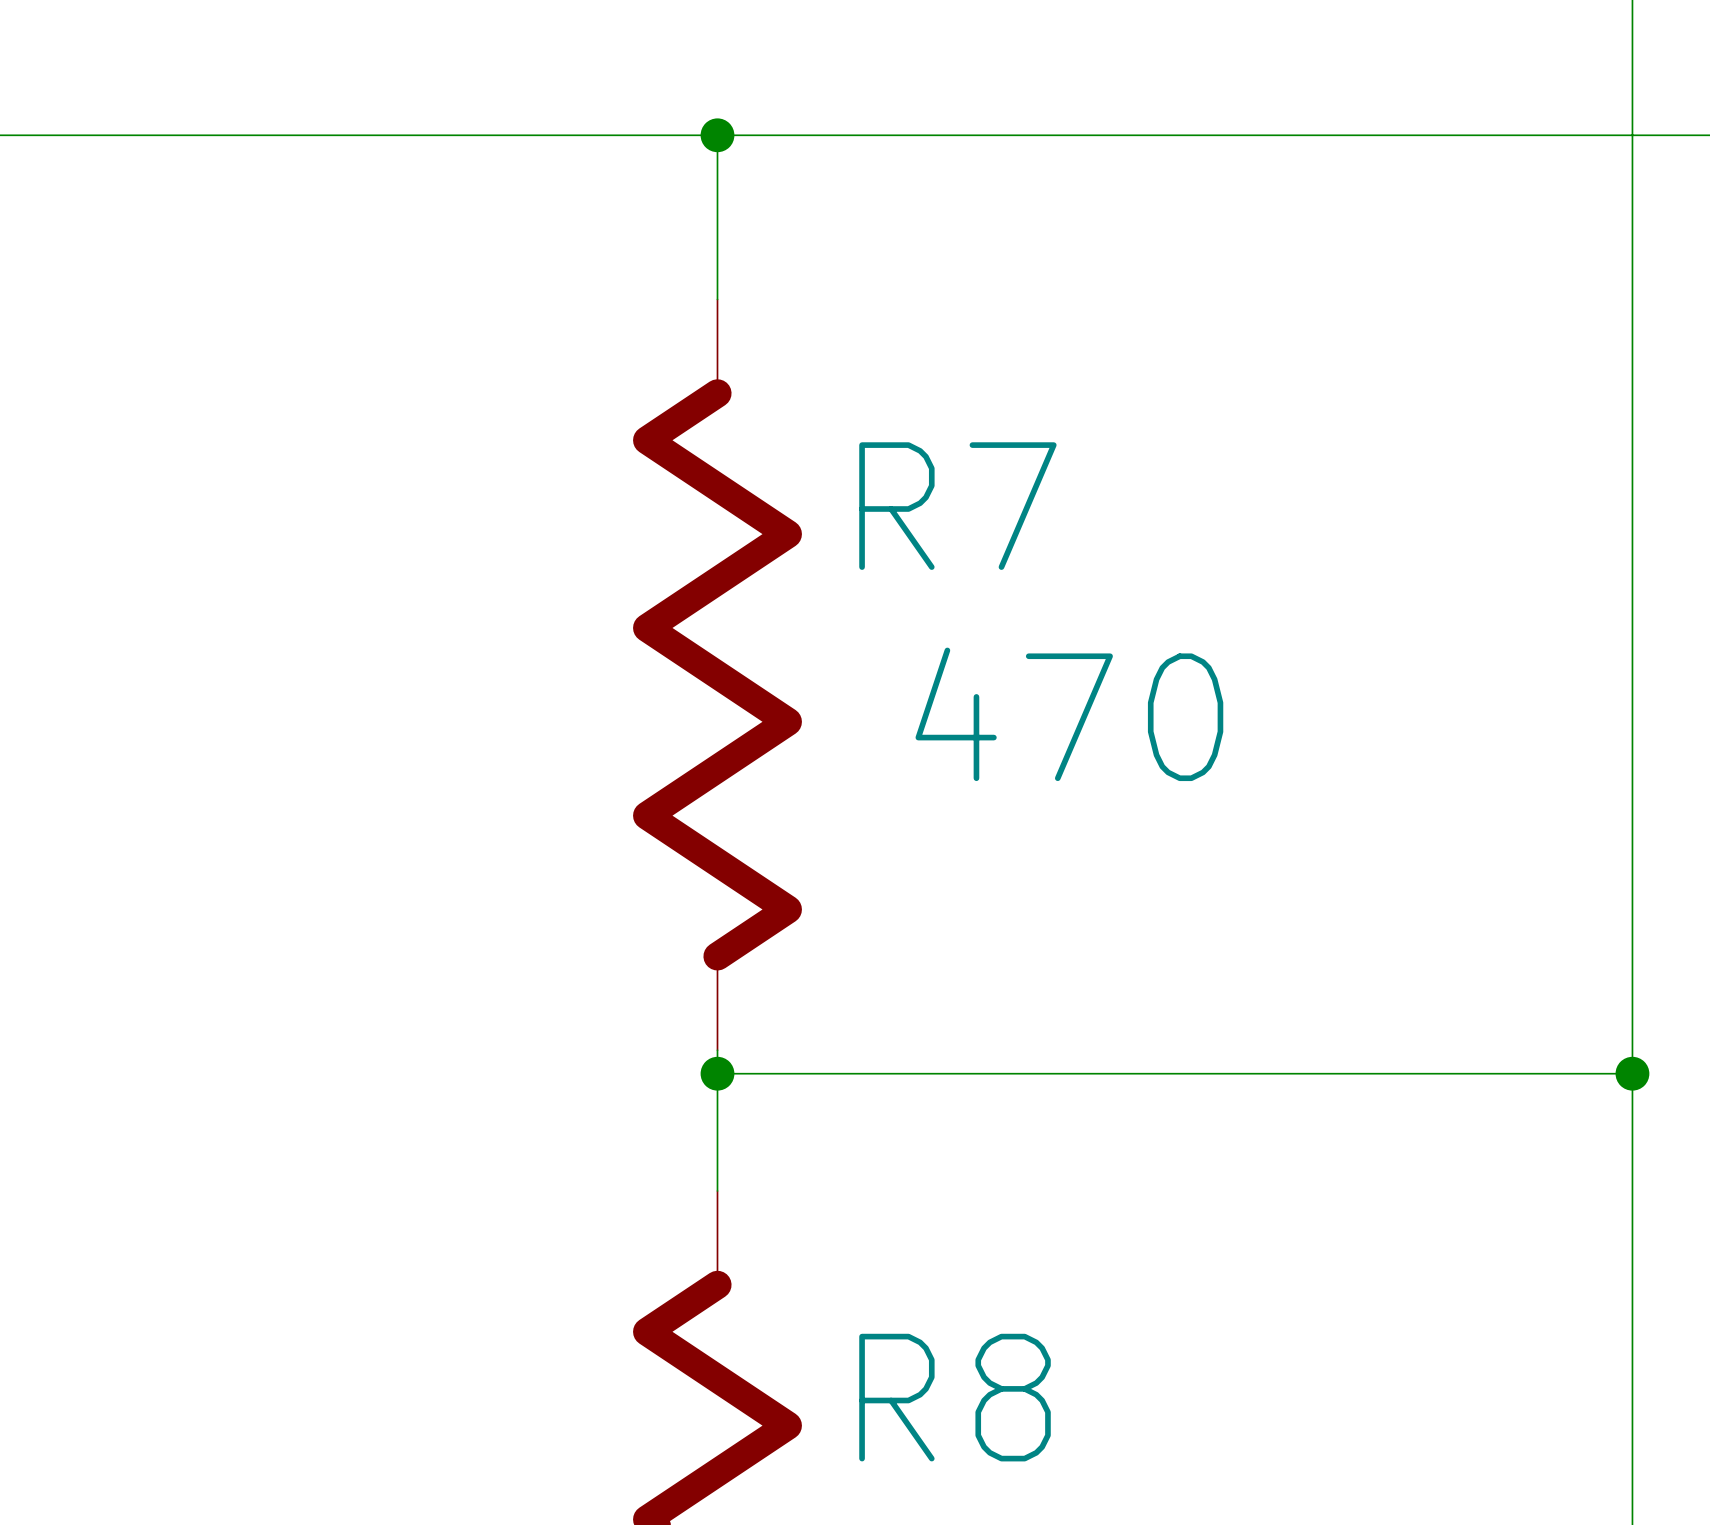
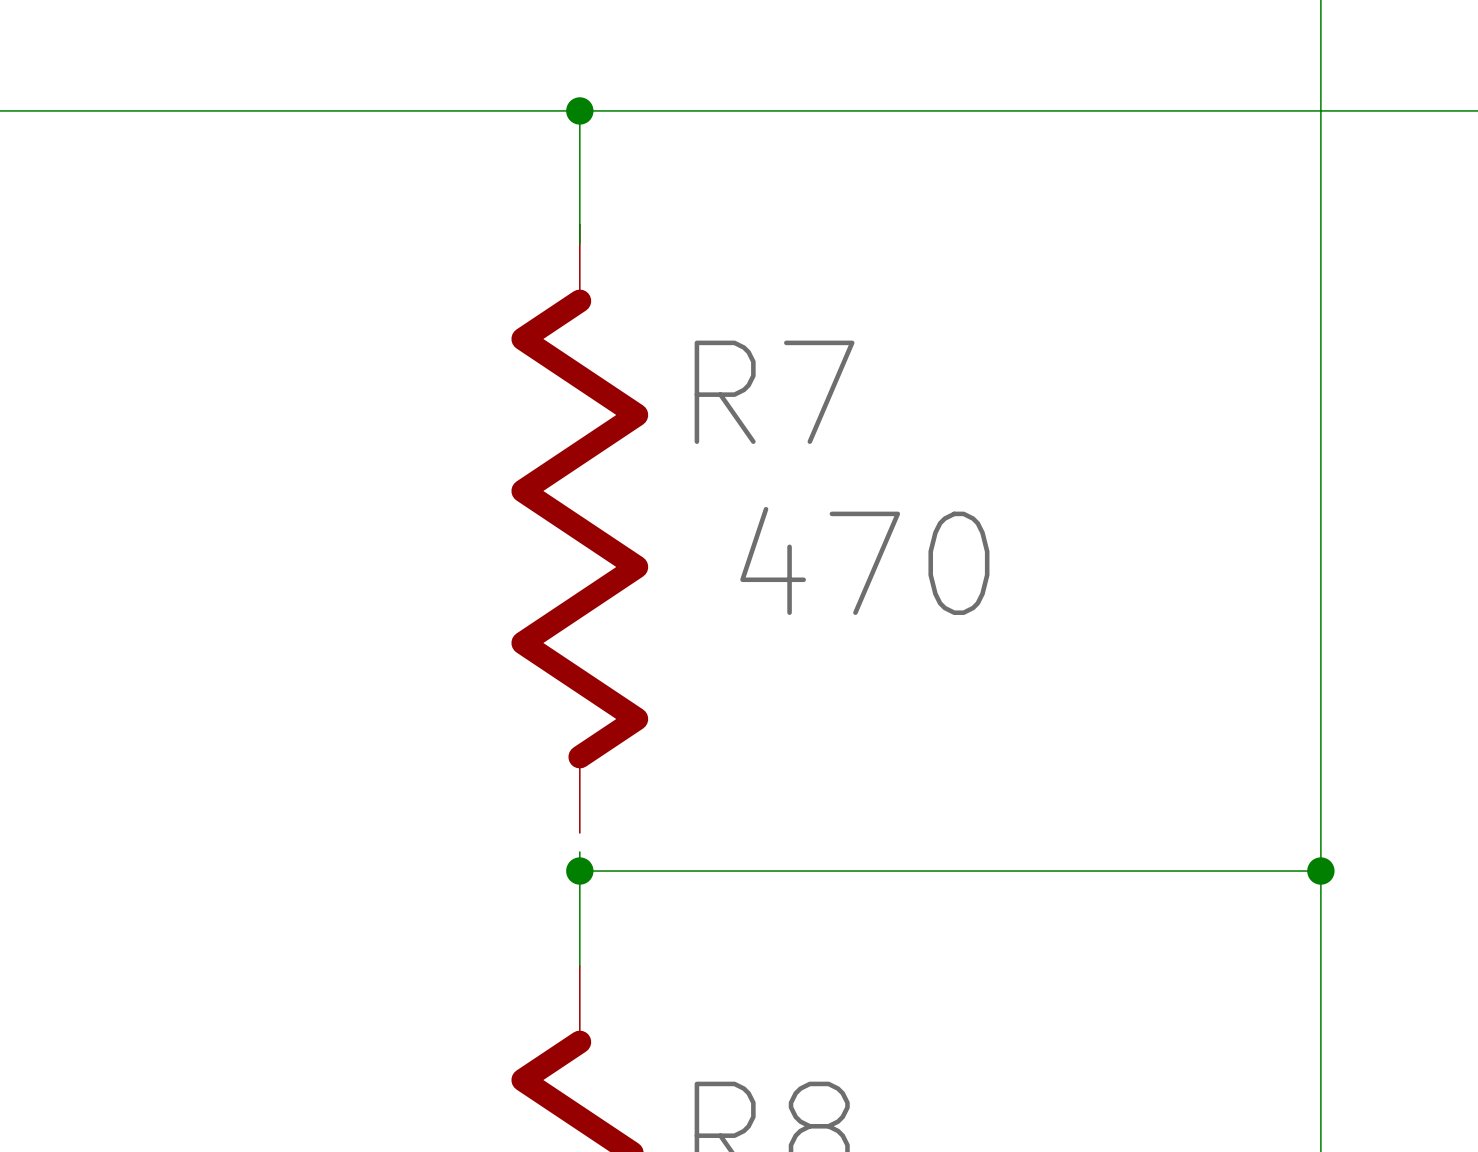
part position: (717, 674) -> (579, 528)

